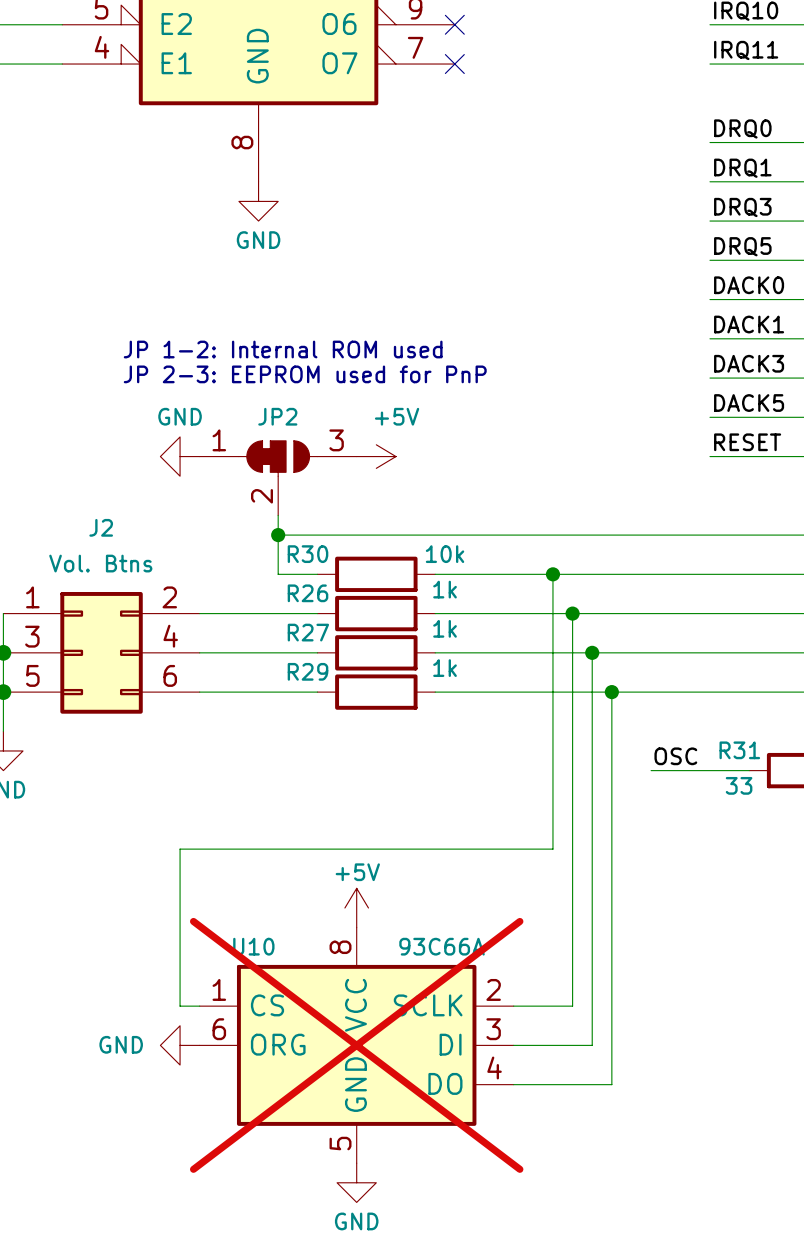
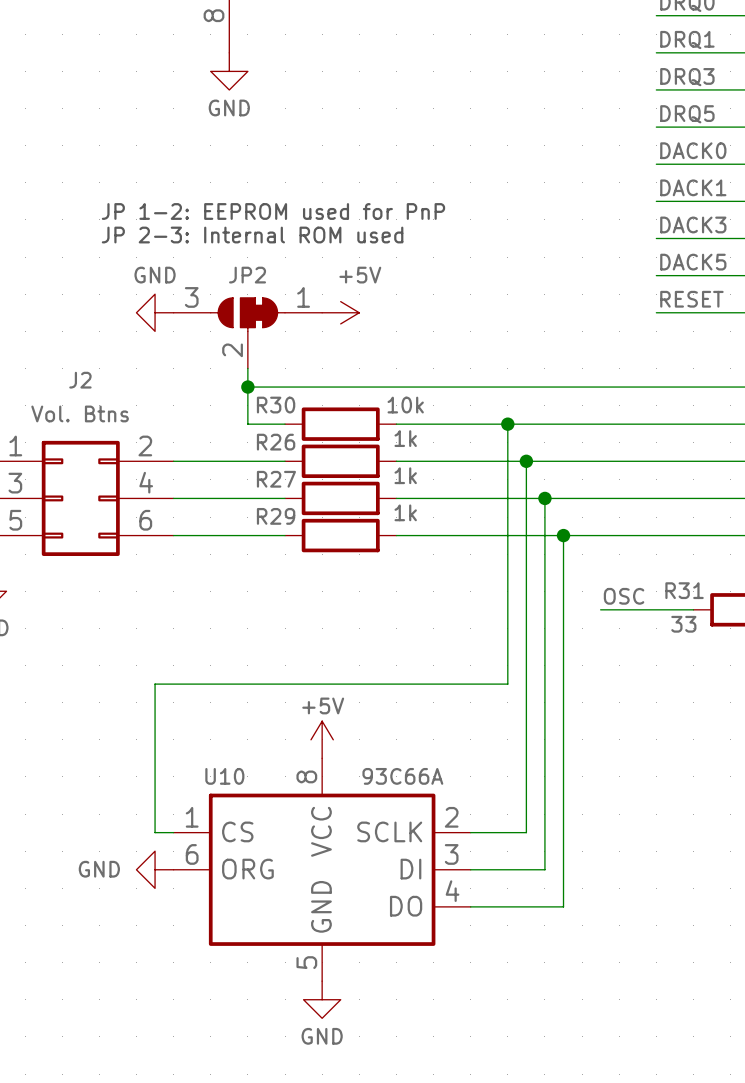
text: JP 1-2: Internal ROM used (283, 349) -> JP 1-2: EEPROM used for PnP (273, 211)
text: JP 2-3: EEPROM used for PnP (305, 374) -> JP 2-3: Internal ROM used (252, 235)
JP2 flip: as is (278, 458) -> left-right (247, 314)
U10 do-not-place cross: (356, 1045) -> none

